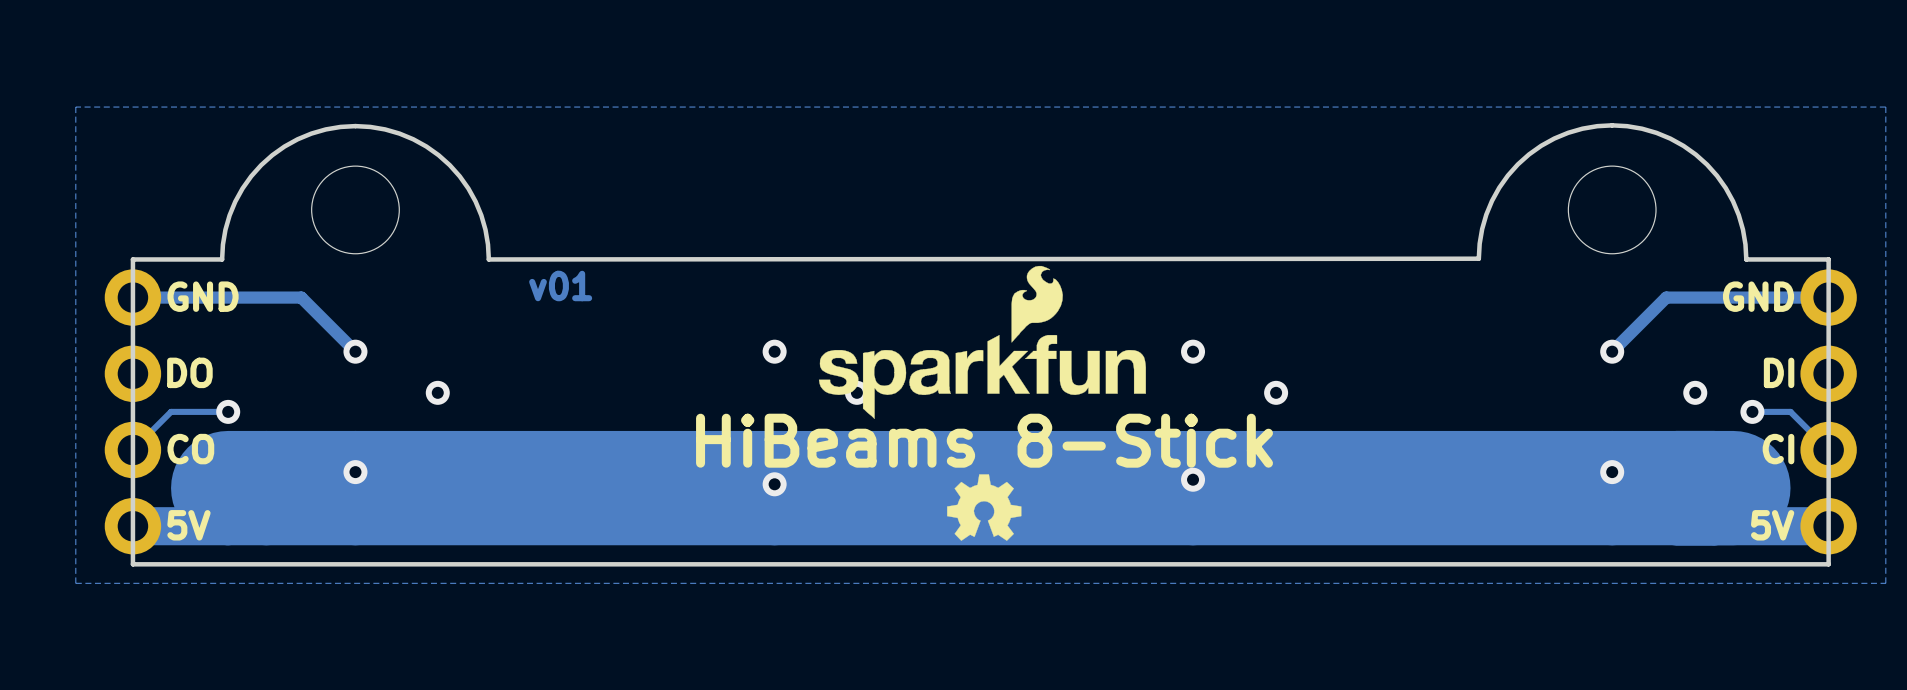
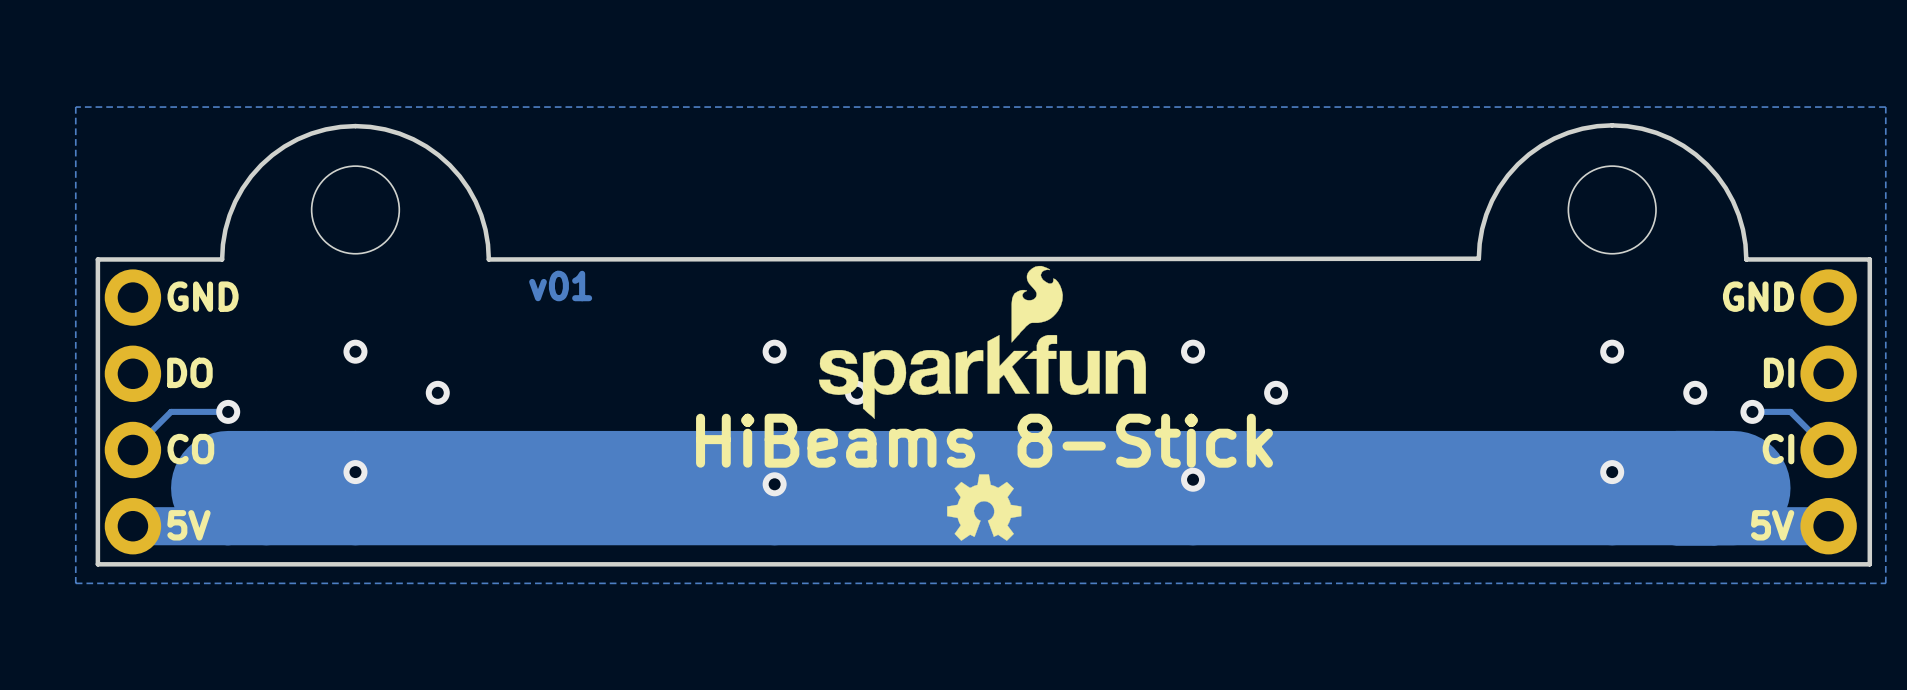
board edge: (132, 259) (132, 564) -> (132, 259) (97, 259) (97, 564) (132, 564)
board edge: (1828, 259) (1828, 564) -> (1828, 259) (1869, 259) (1869, 564) (1828, 564)
track: (132, 297) (301, 297) (355, 351) -> none
track: (1828, 297) (1666, 297) (1612, 351) -> none

